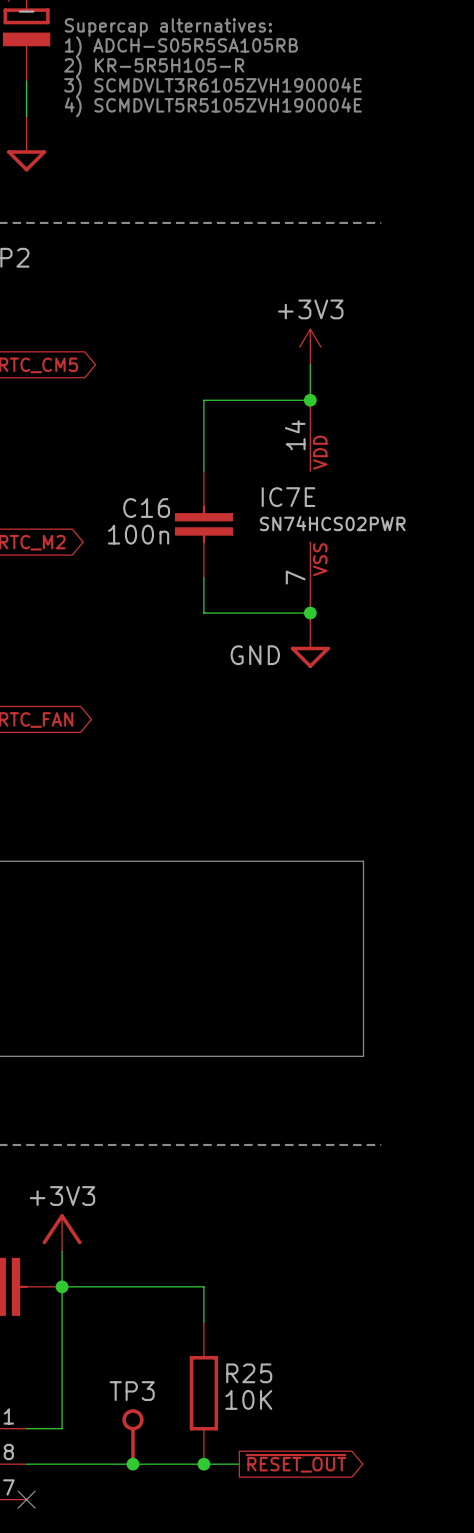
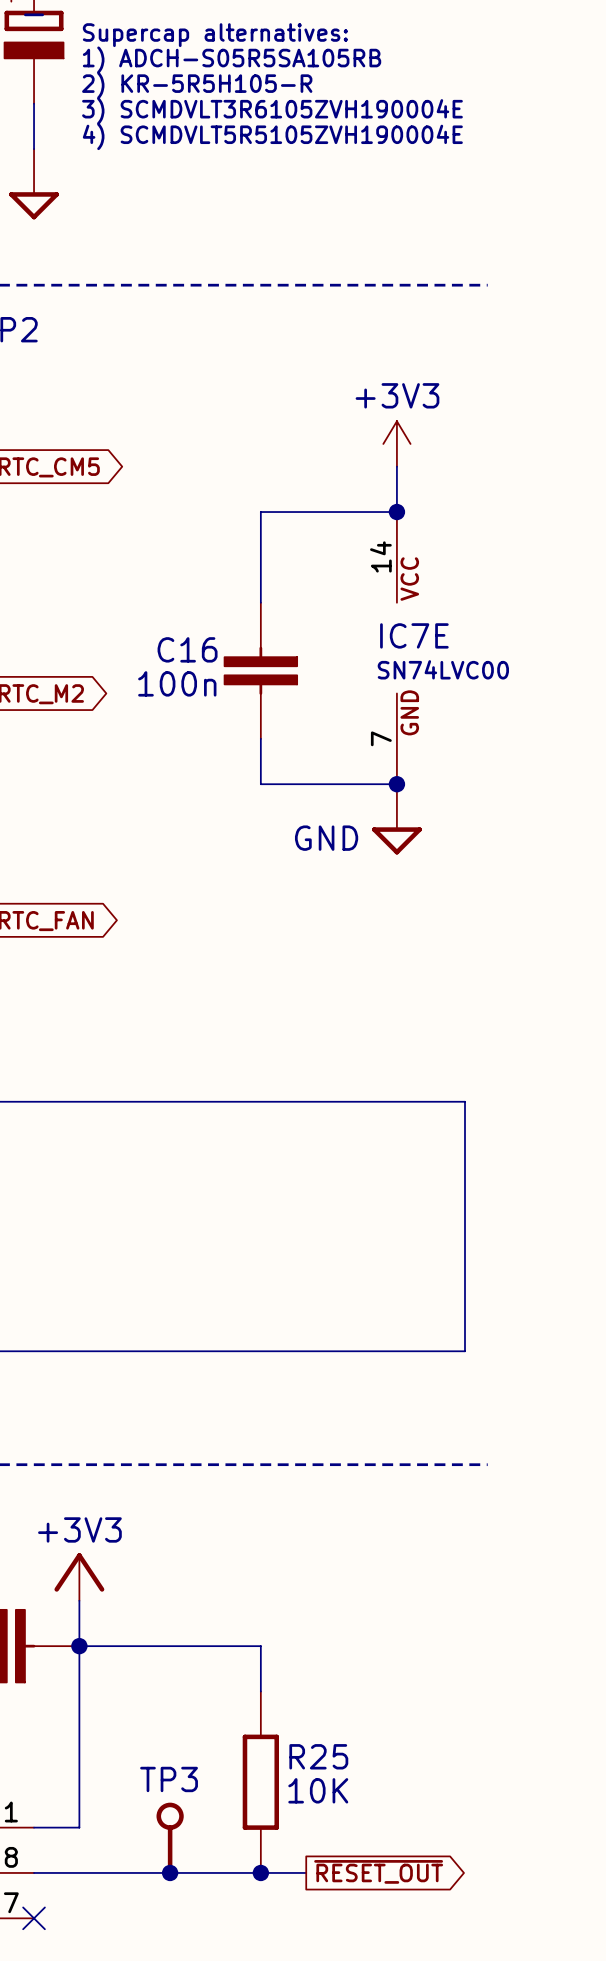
IC7E symbol: [310, 400, 311, 614] -> [396, 512, 397, 785]
IC7E name position: IC7E (288, 497) -> IC7E (414, 635)
IC7E value: SN74HCS02PWR (332, 523) -> SN74LVC00 (443, 669)

